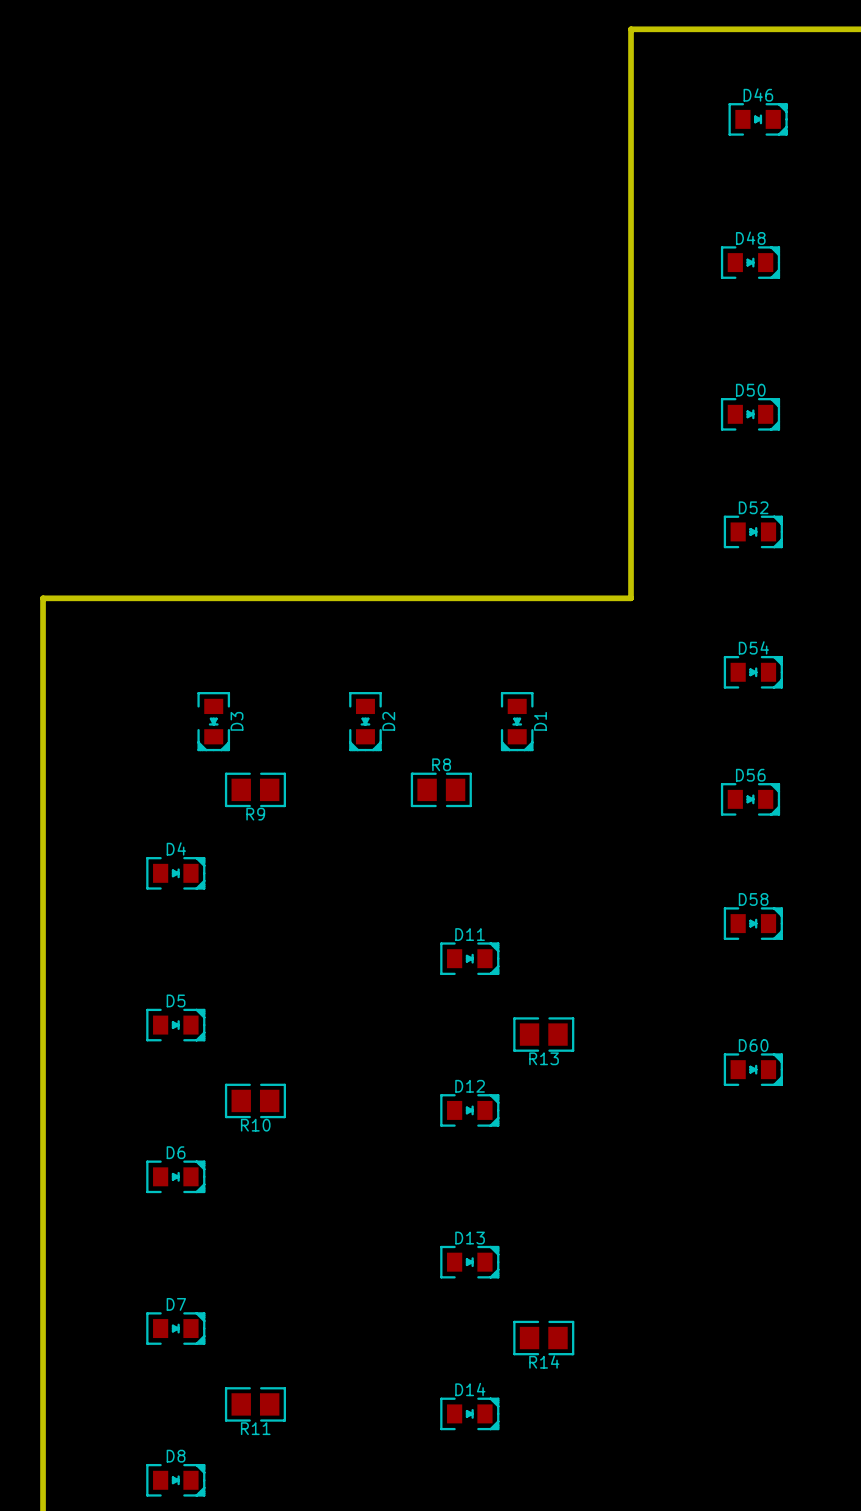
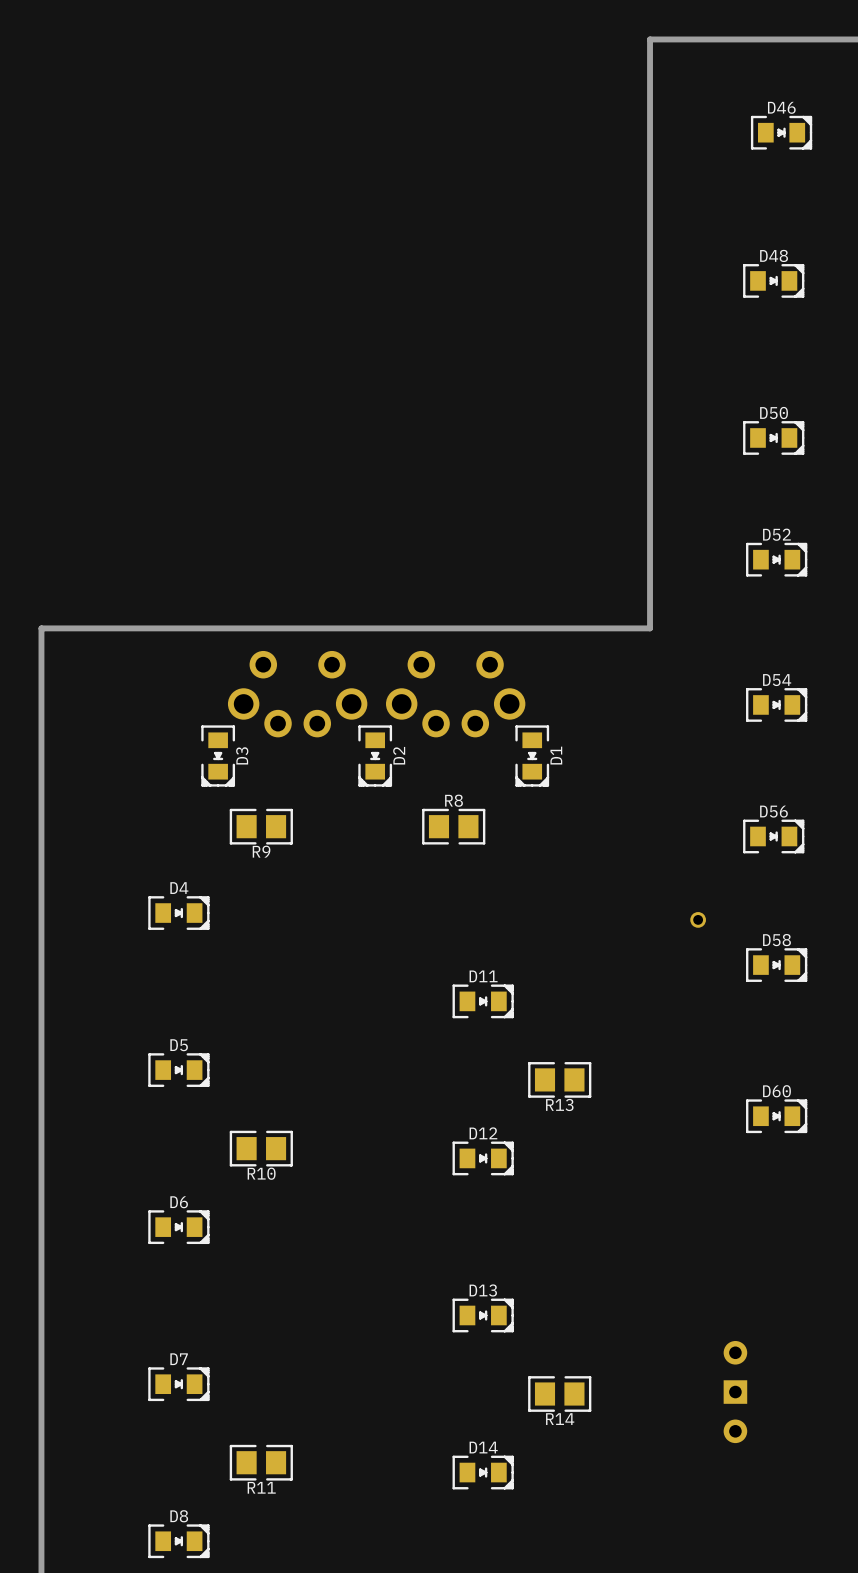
part: none -> (297, 694)
part: none -> (455, 694)
part: none -> (698, 919)
part: none -> (735, 1392)

